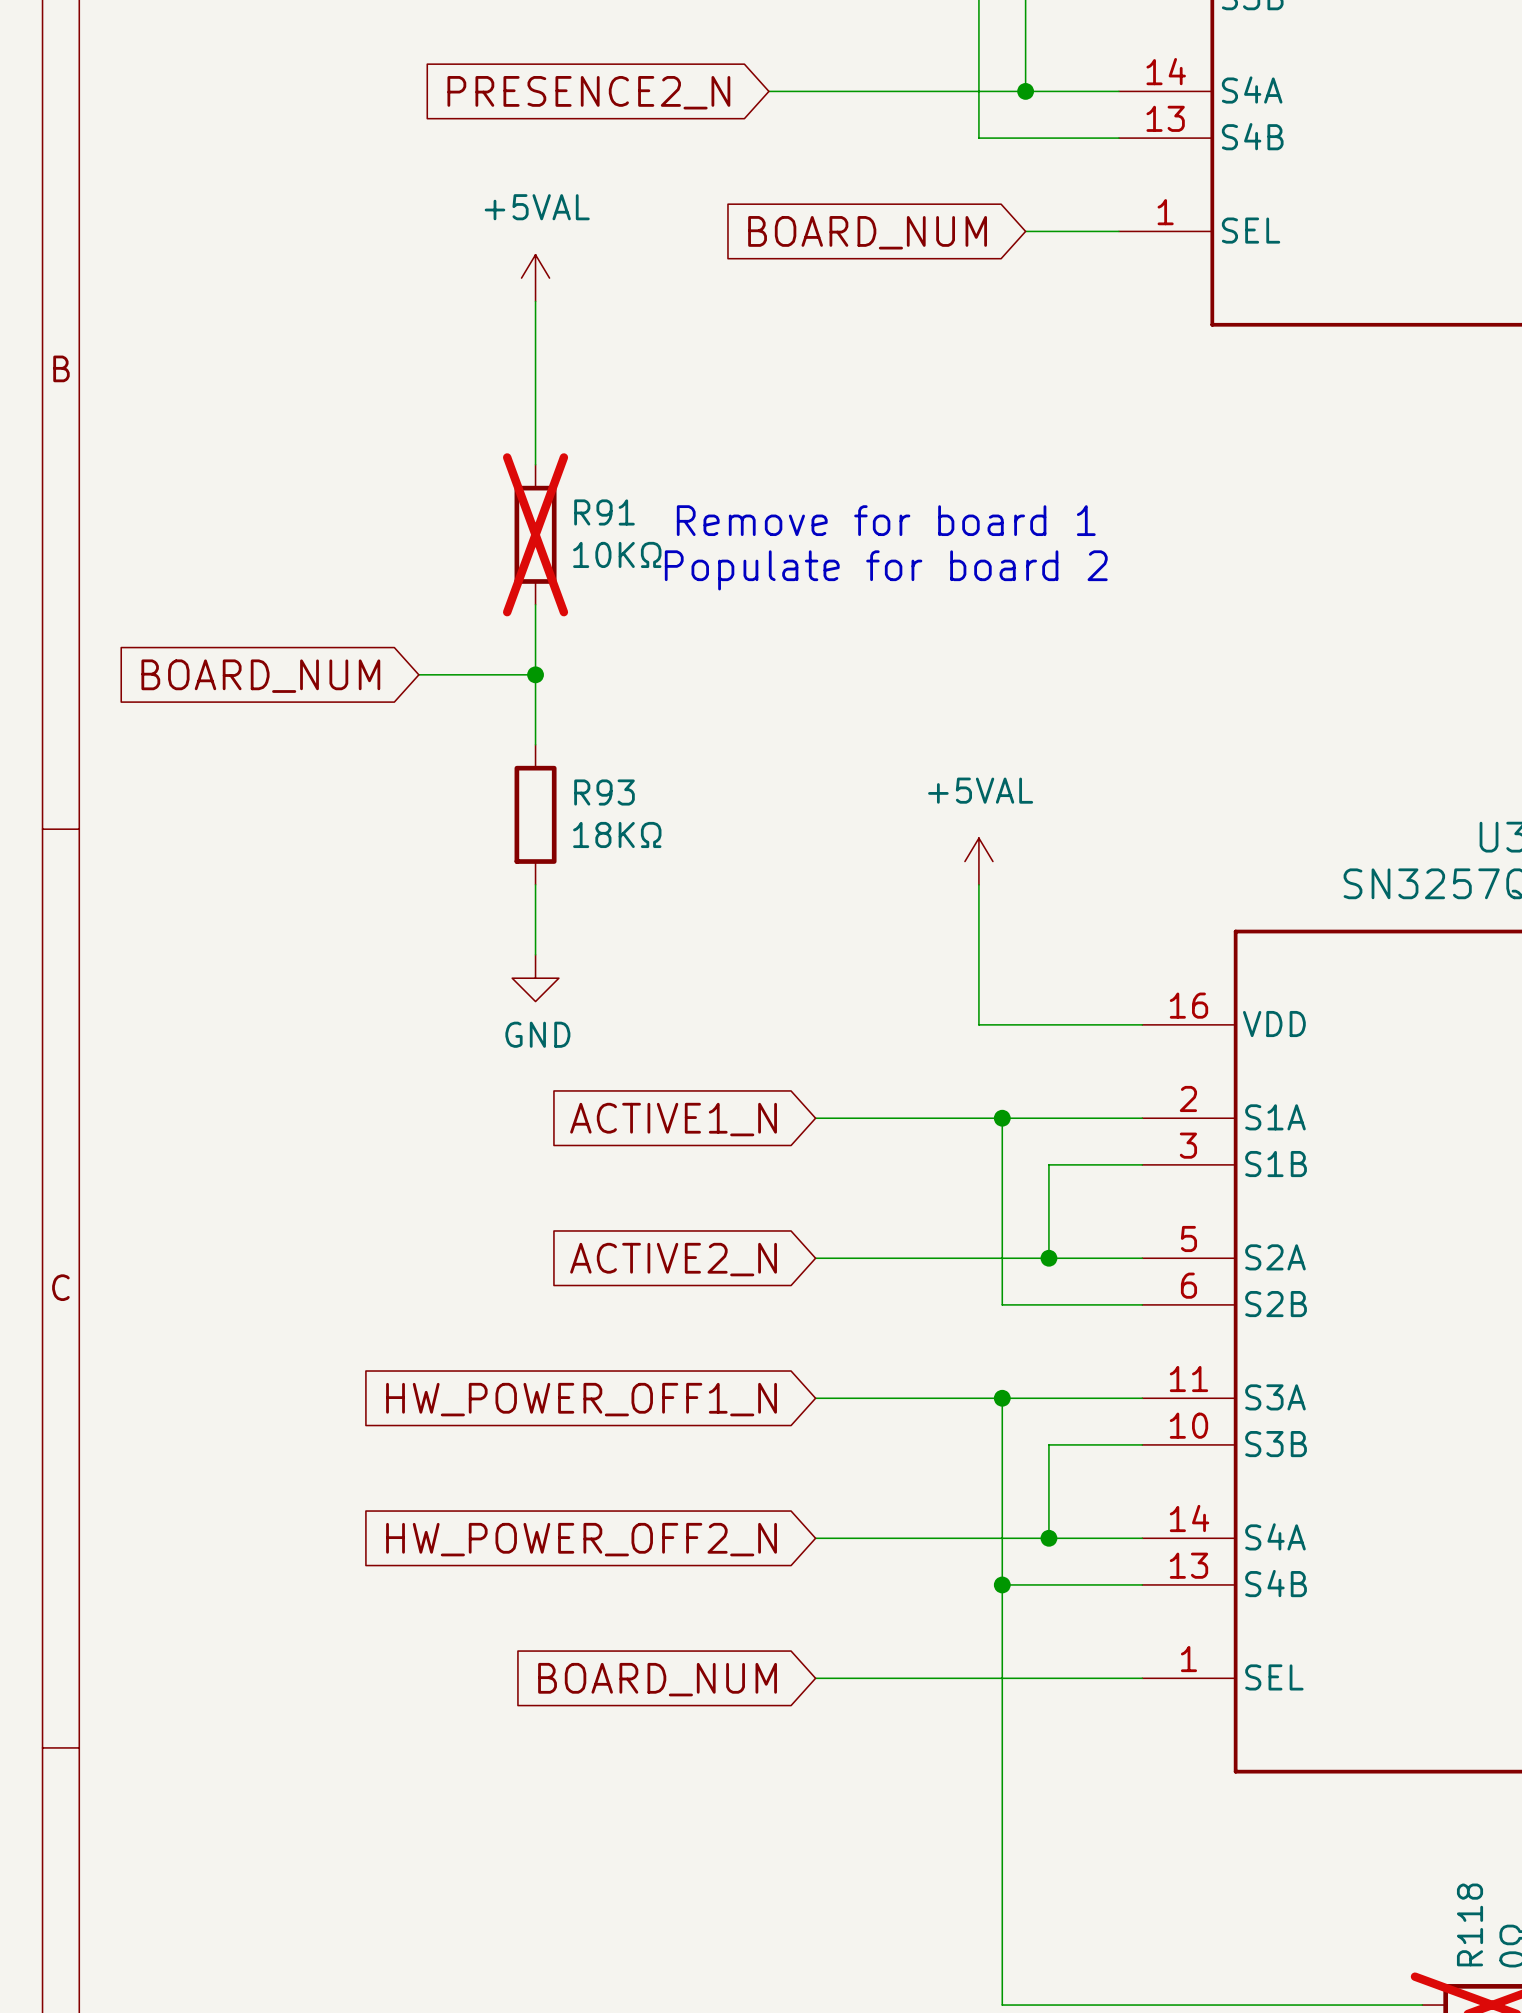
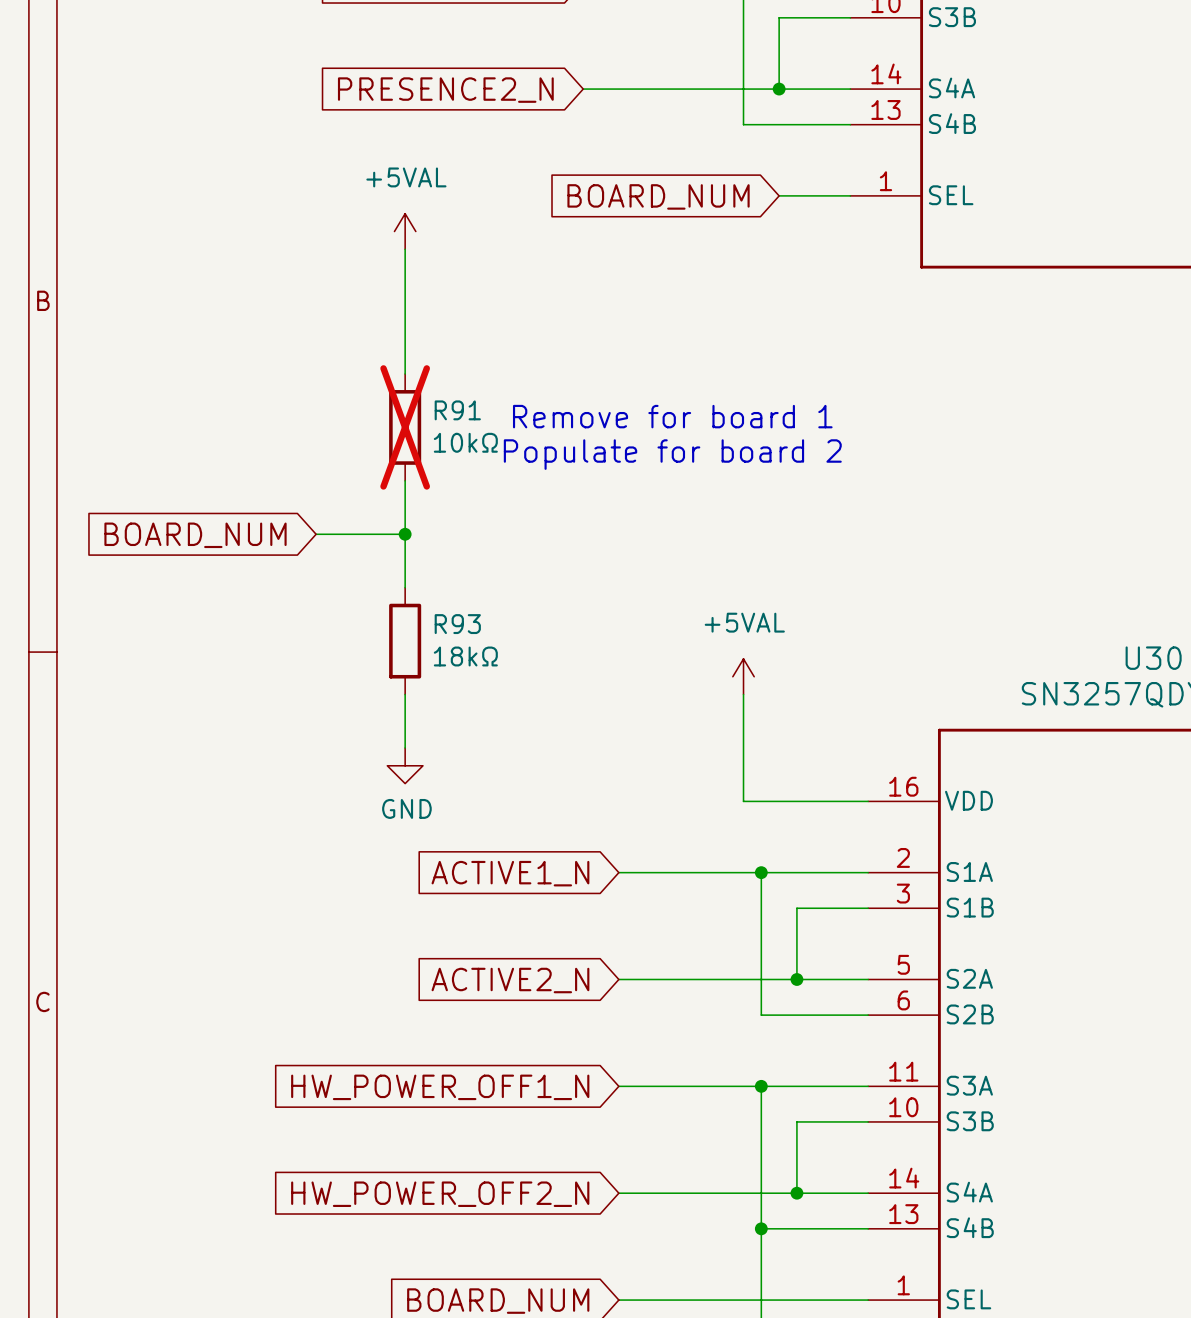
R91 value: 10KΩ (617, 554) -> 10kΩ (465, 442)
R93 value: 18KΩ (617, 834) -> 18kΩ (465, 656)

